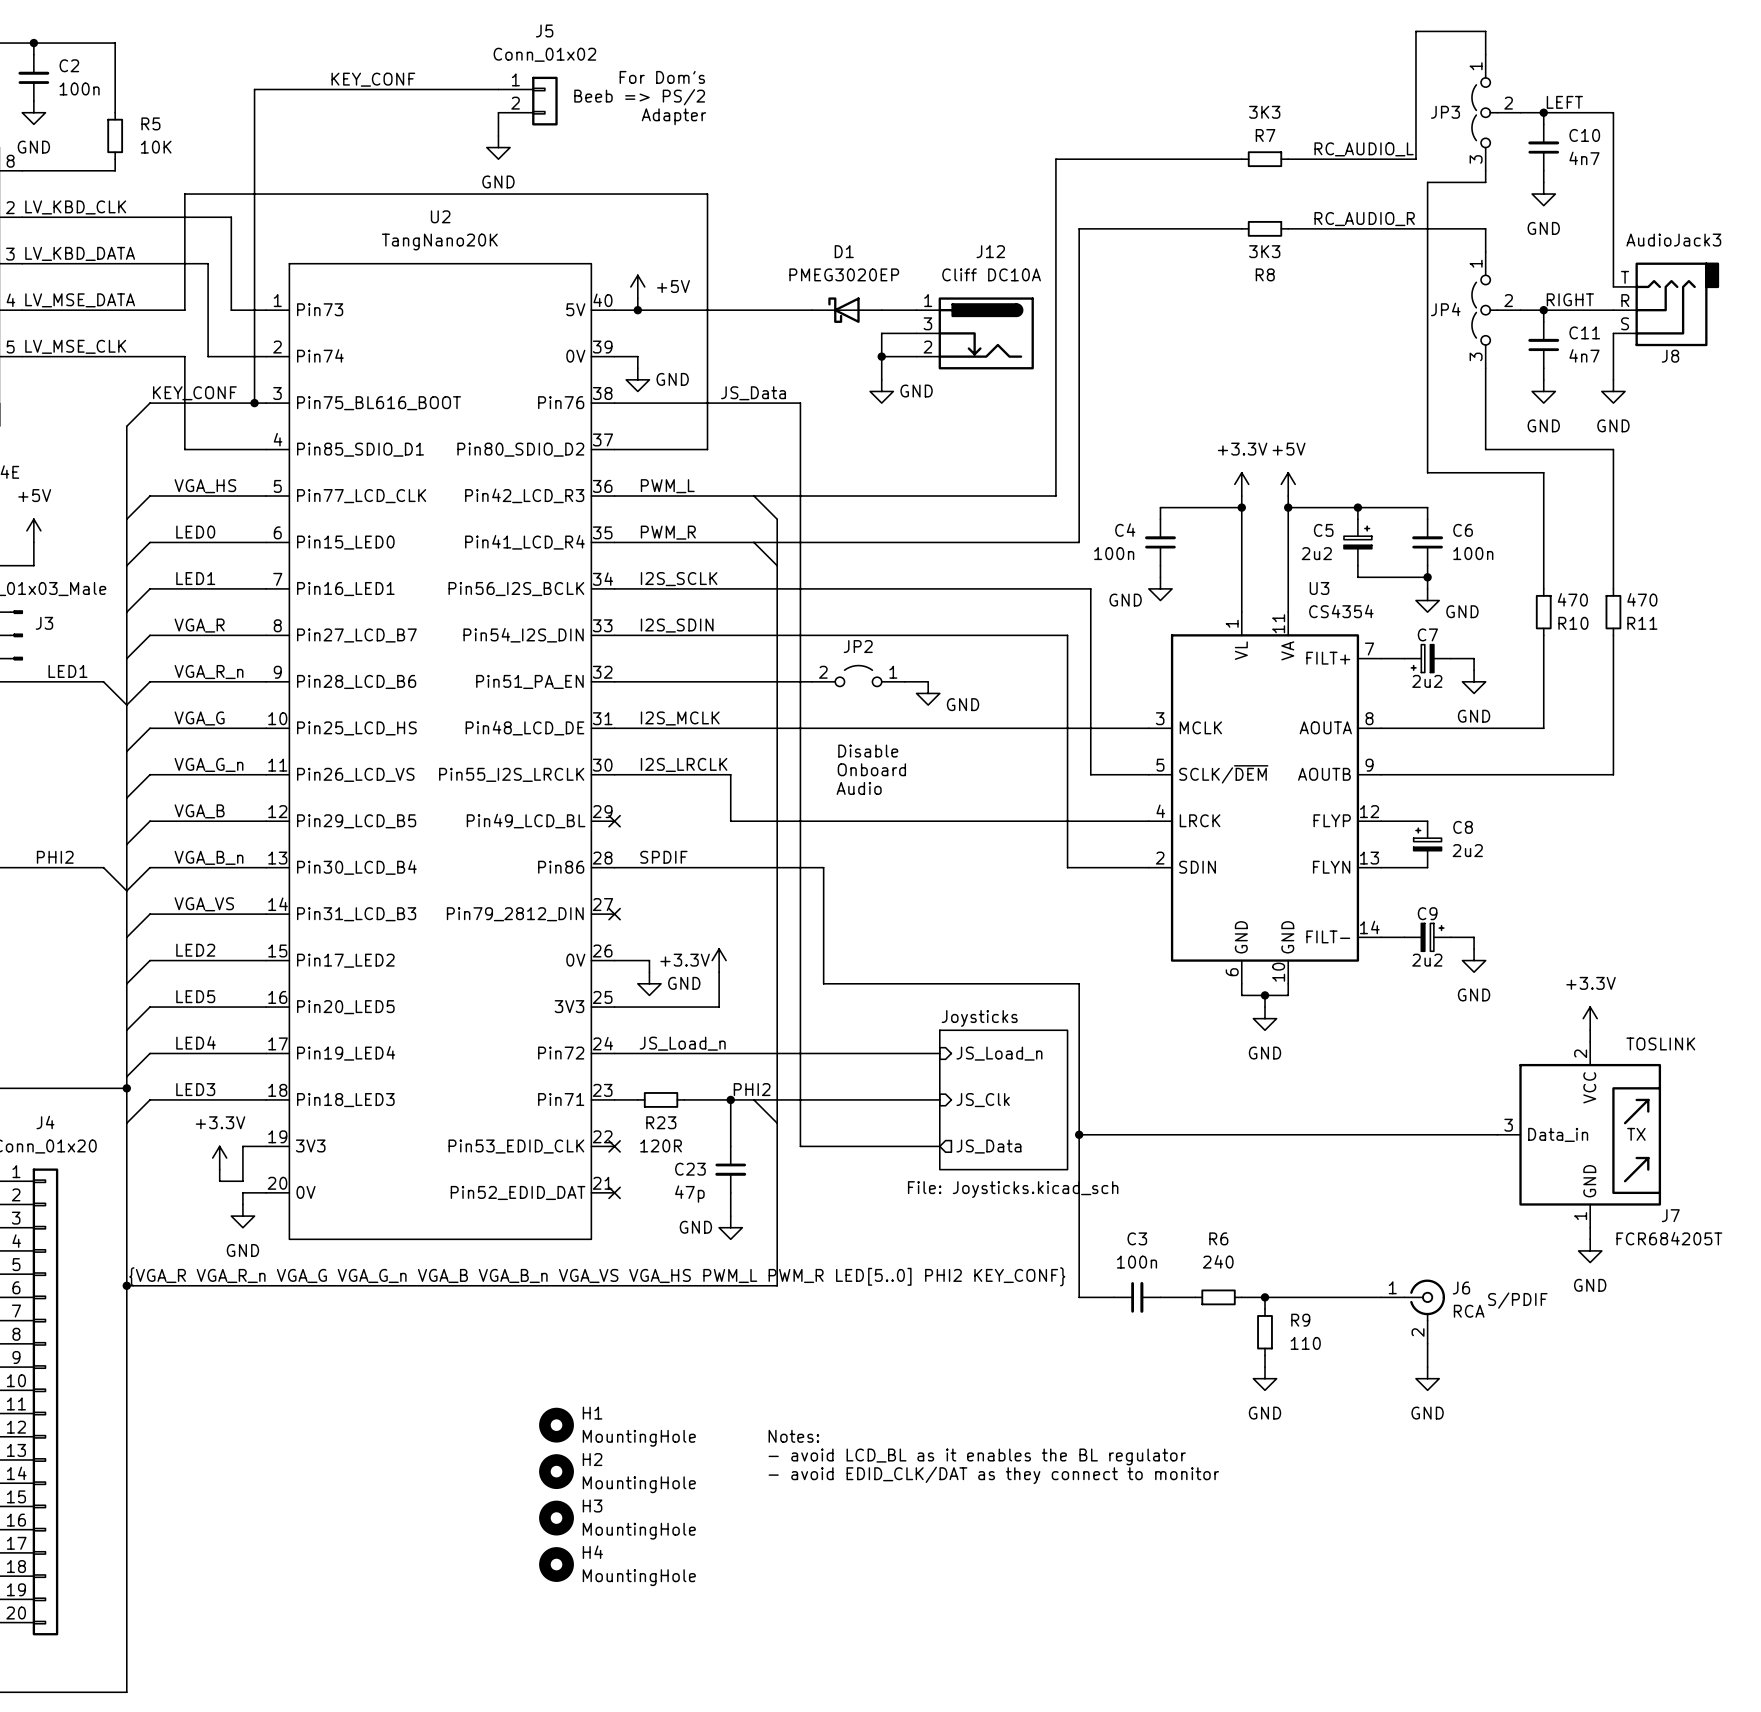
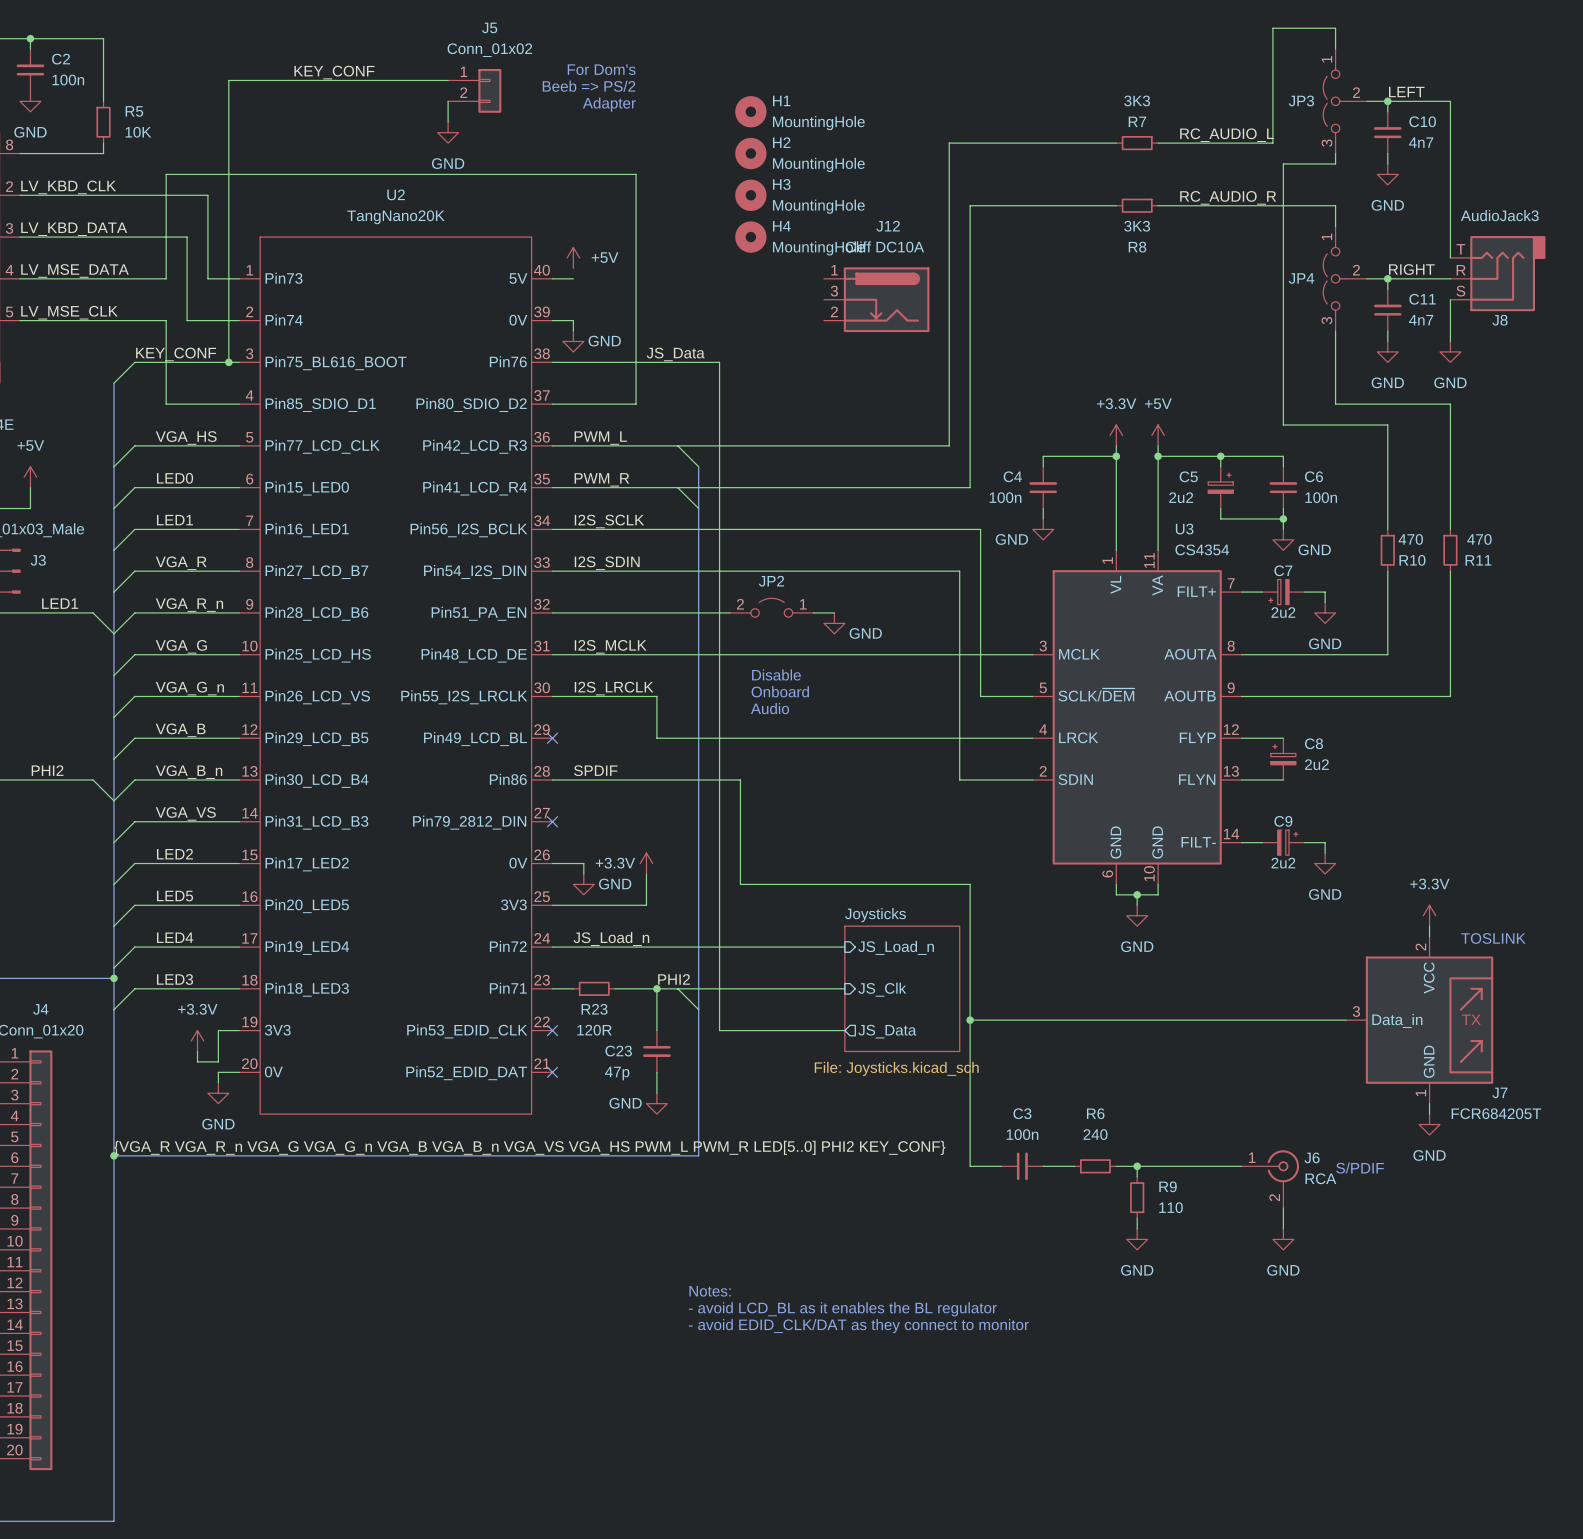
wire: (637, 298) (637, 310) (812, 310) -> none
junction: (637, 310) -> none
D1: PMEG3020EP (846, 310) -> none
wire: (881, 310) (916, 310) -> none
wire: (916, 333) (881, 333) (881, 379) -> none
wire: (881, 356) (916, 356) -> none
junction: (881, 356) -> none
power symbol: GND (881, 391) -> none
H1 position: (556, 1425) -> (750, 111)
H2 position: (556, 1471) -> (750, 153)
H3 position: (556, 1518) -> (750, 195)
H4 position: (556, 1564) -> (750, 237)

